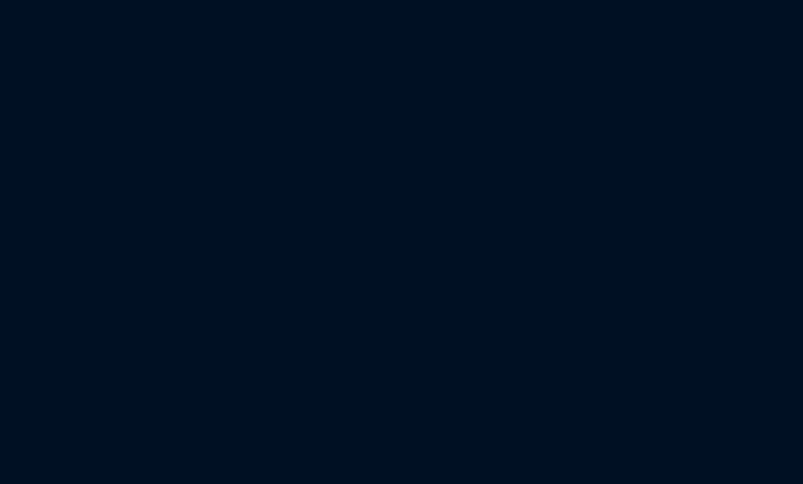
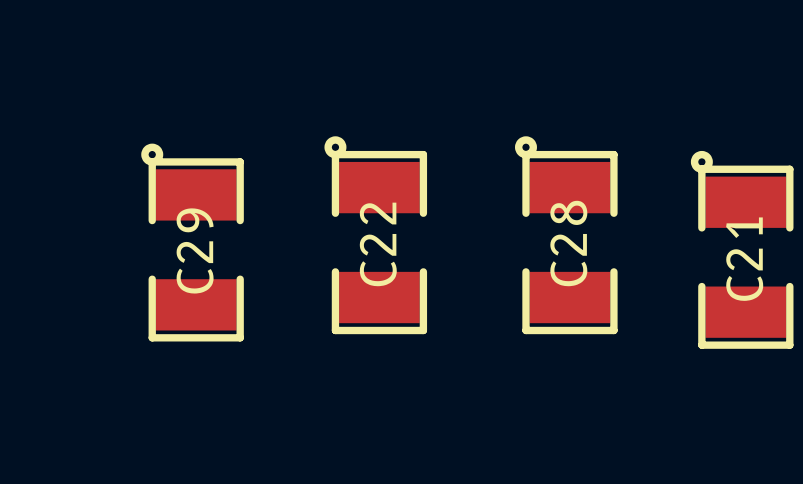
C22: none -> (375, 235)
C28: none -> (566, 235)
C29: none -> (192, 242)
C21: none -> (742, 249)

